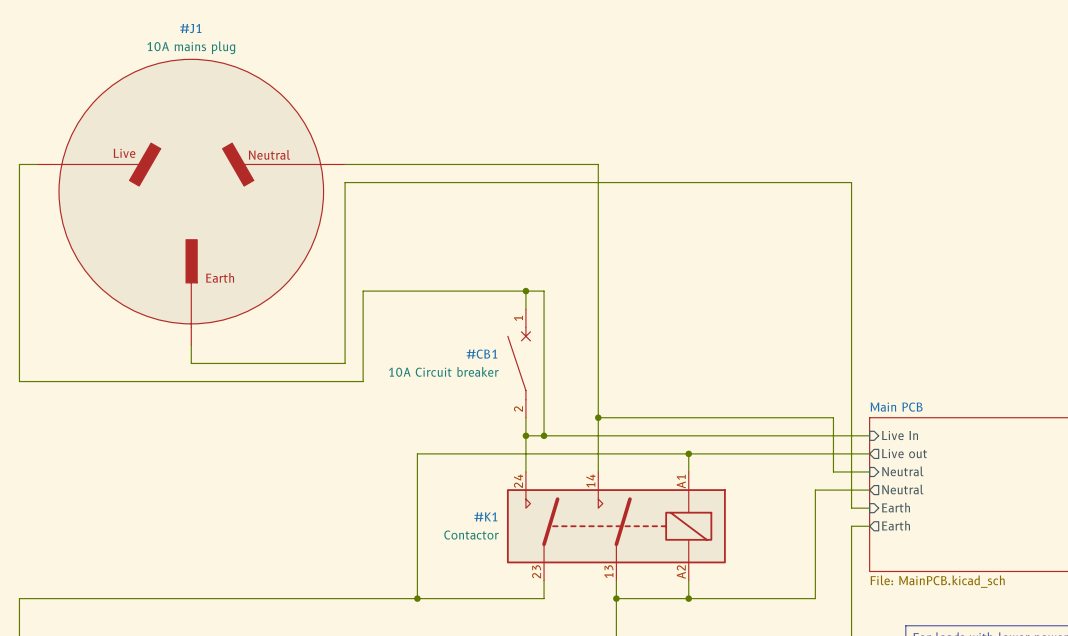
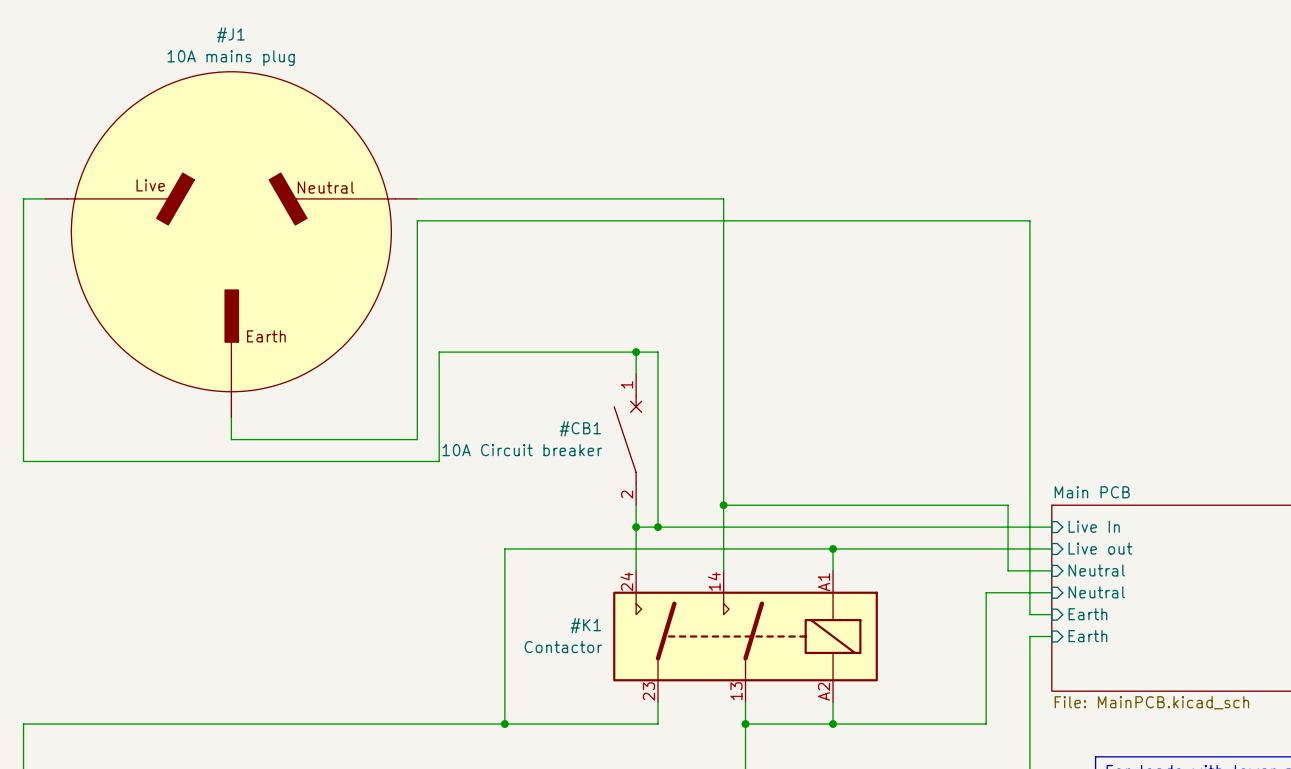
sheet pin shape: output (904, 453) -> input (1100, 548)
sheet pin shape: output (902, 489) -> input (1096, 592)
sheet pin shape: output (896, 525) -> input (1087, 636)

